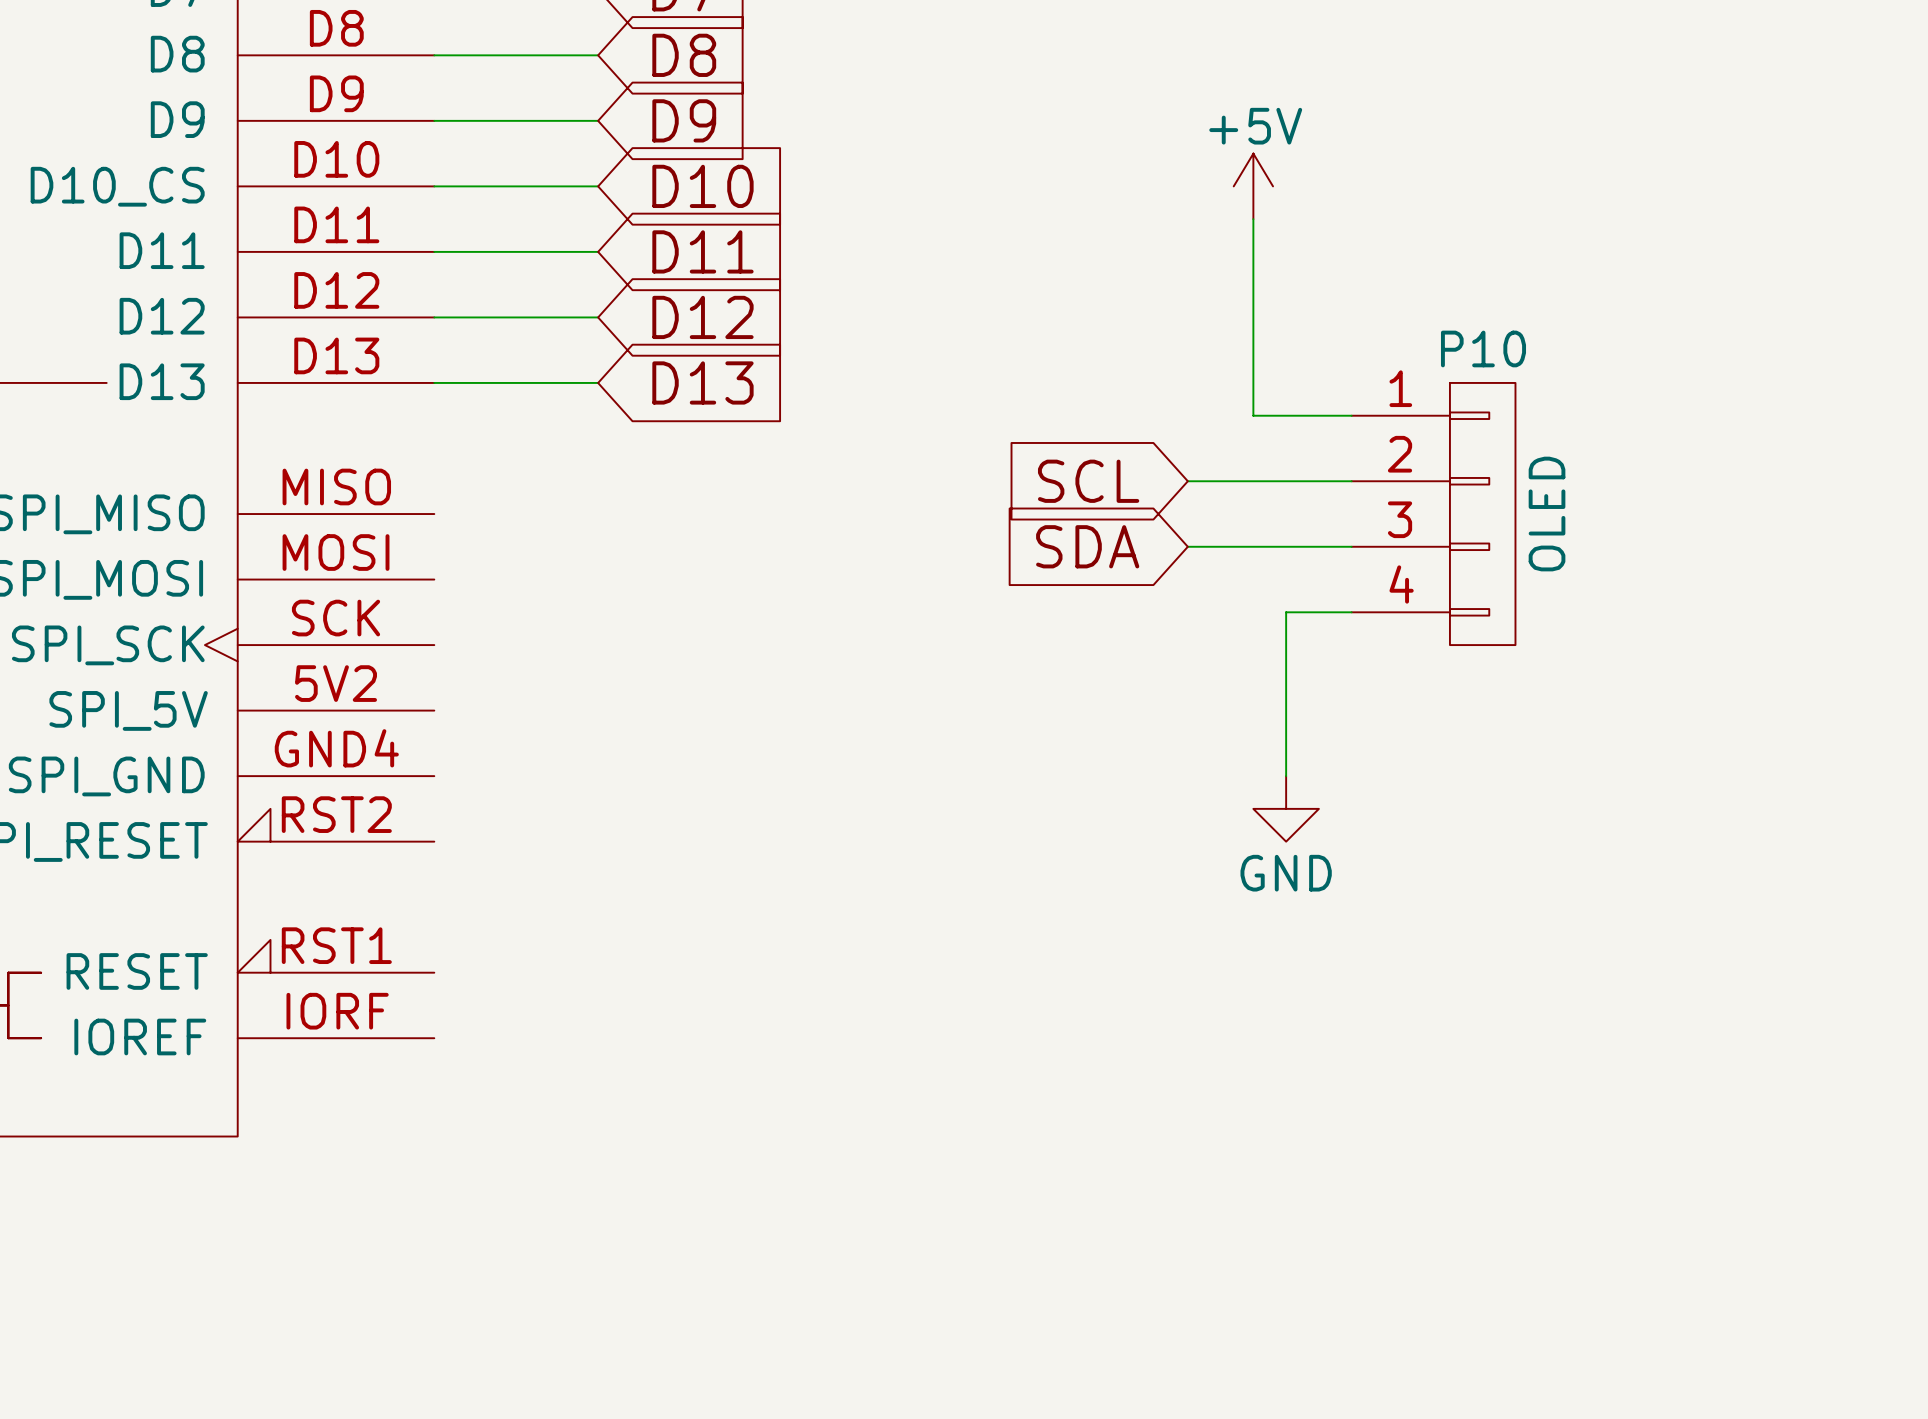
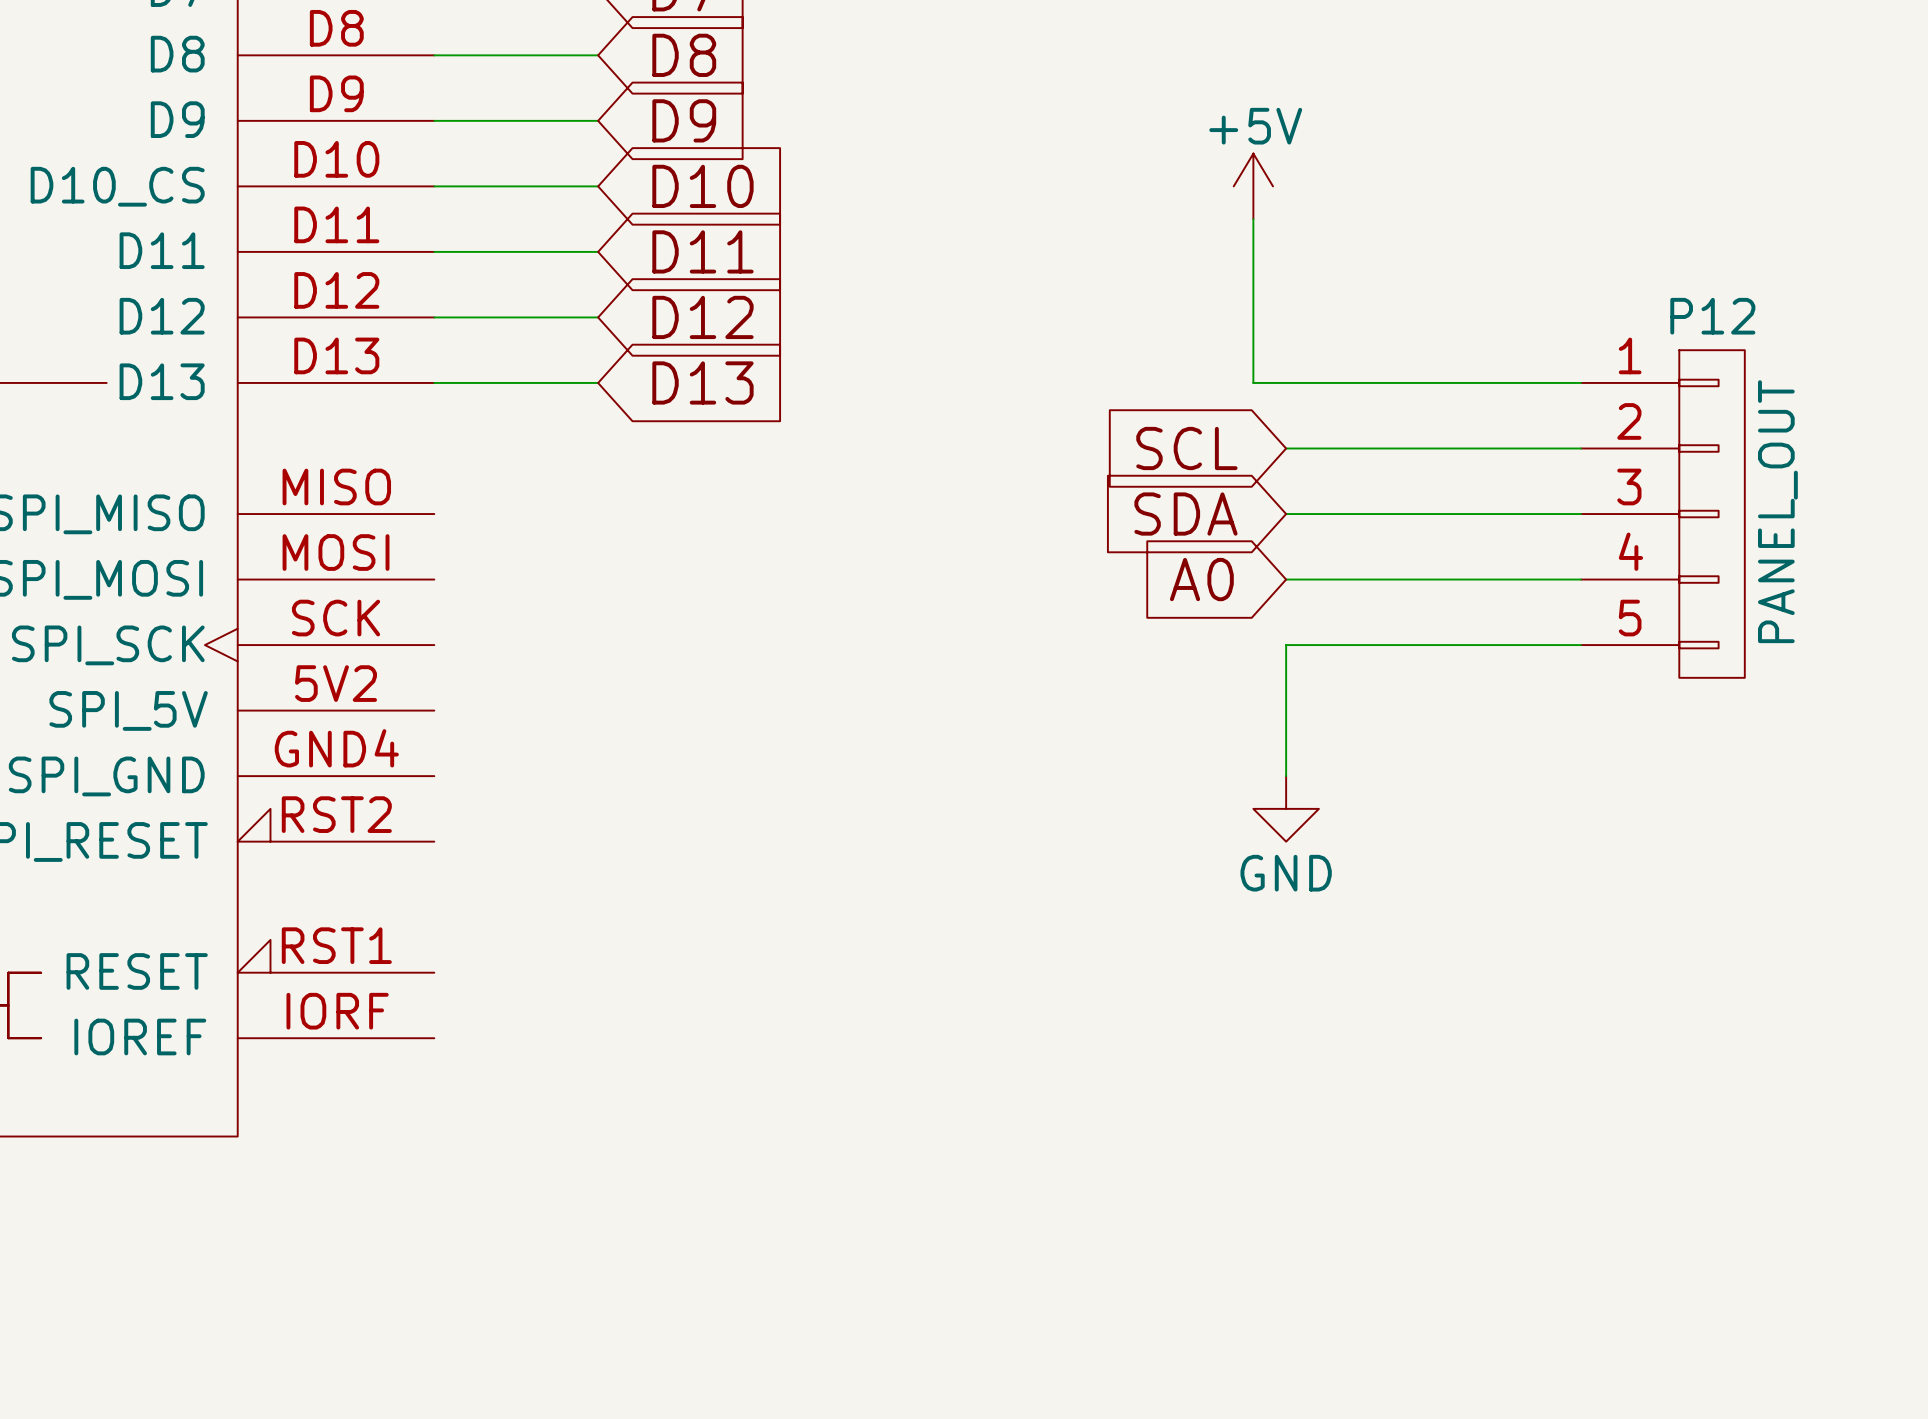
wire: (1253, 382) (1253, 415) (1351, 415) -> (1253, 382) (1581, 382)
wire: none -> (1286, 448) (1581, 448)
global label position: SCL (1088, 481) -> SCL (1186, 448)
wire: (1187, 481) (1351, 481) -> none
wire: none -> (1286, 514) (1581, 514)
P10: OLED (1433, 514) -> none
P12: none -> PANEL_OUT (1662, 514)
global label position: SDA (1087, 546) -> SDA (1185, 514)
wire: (1187, 546) (1351, 546) -> none
global label: none -> A0 (1201, 579)
wire: none -> (1286, 579) (1581, 579)
wire: (1351, 612) (1286, 612) (1286, 645) -> (1581, 645) (1286, 645)

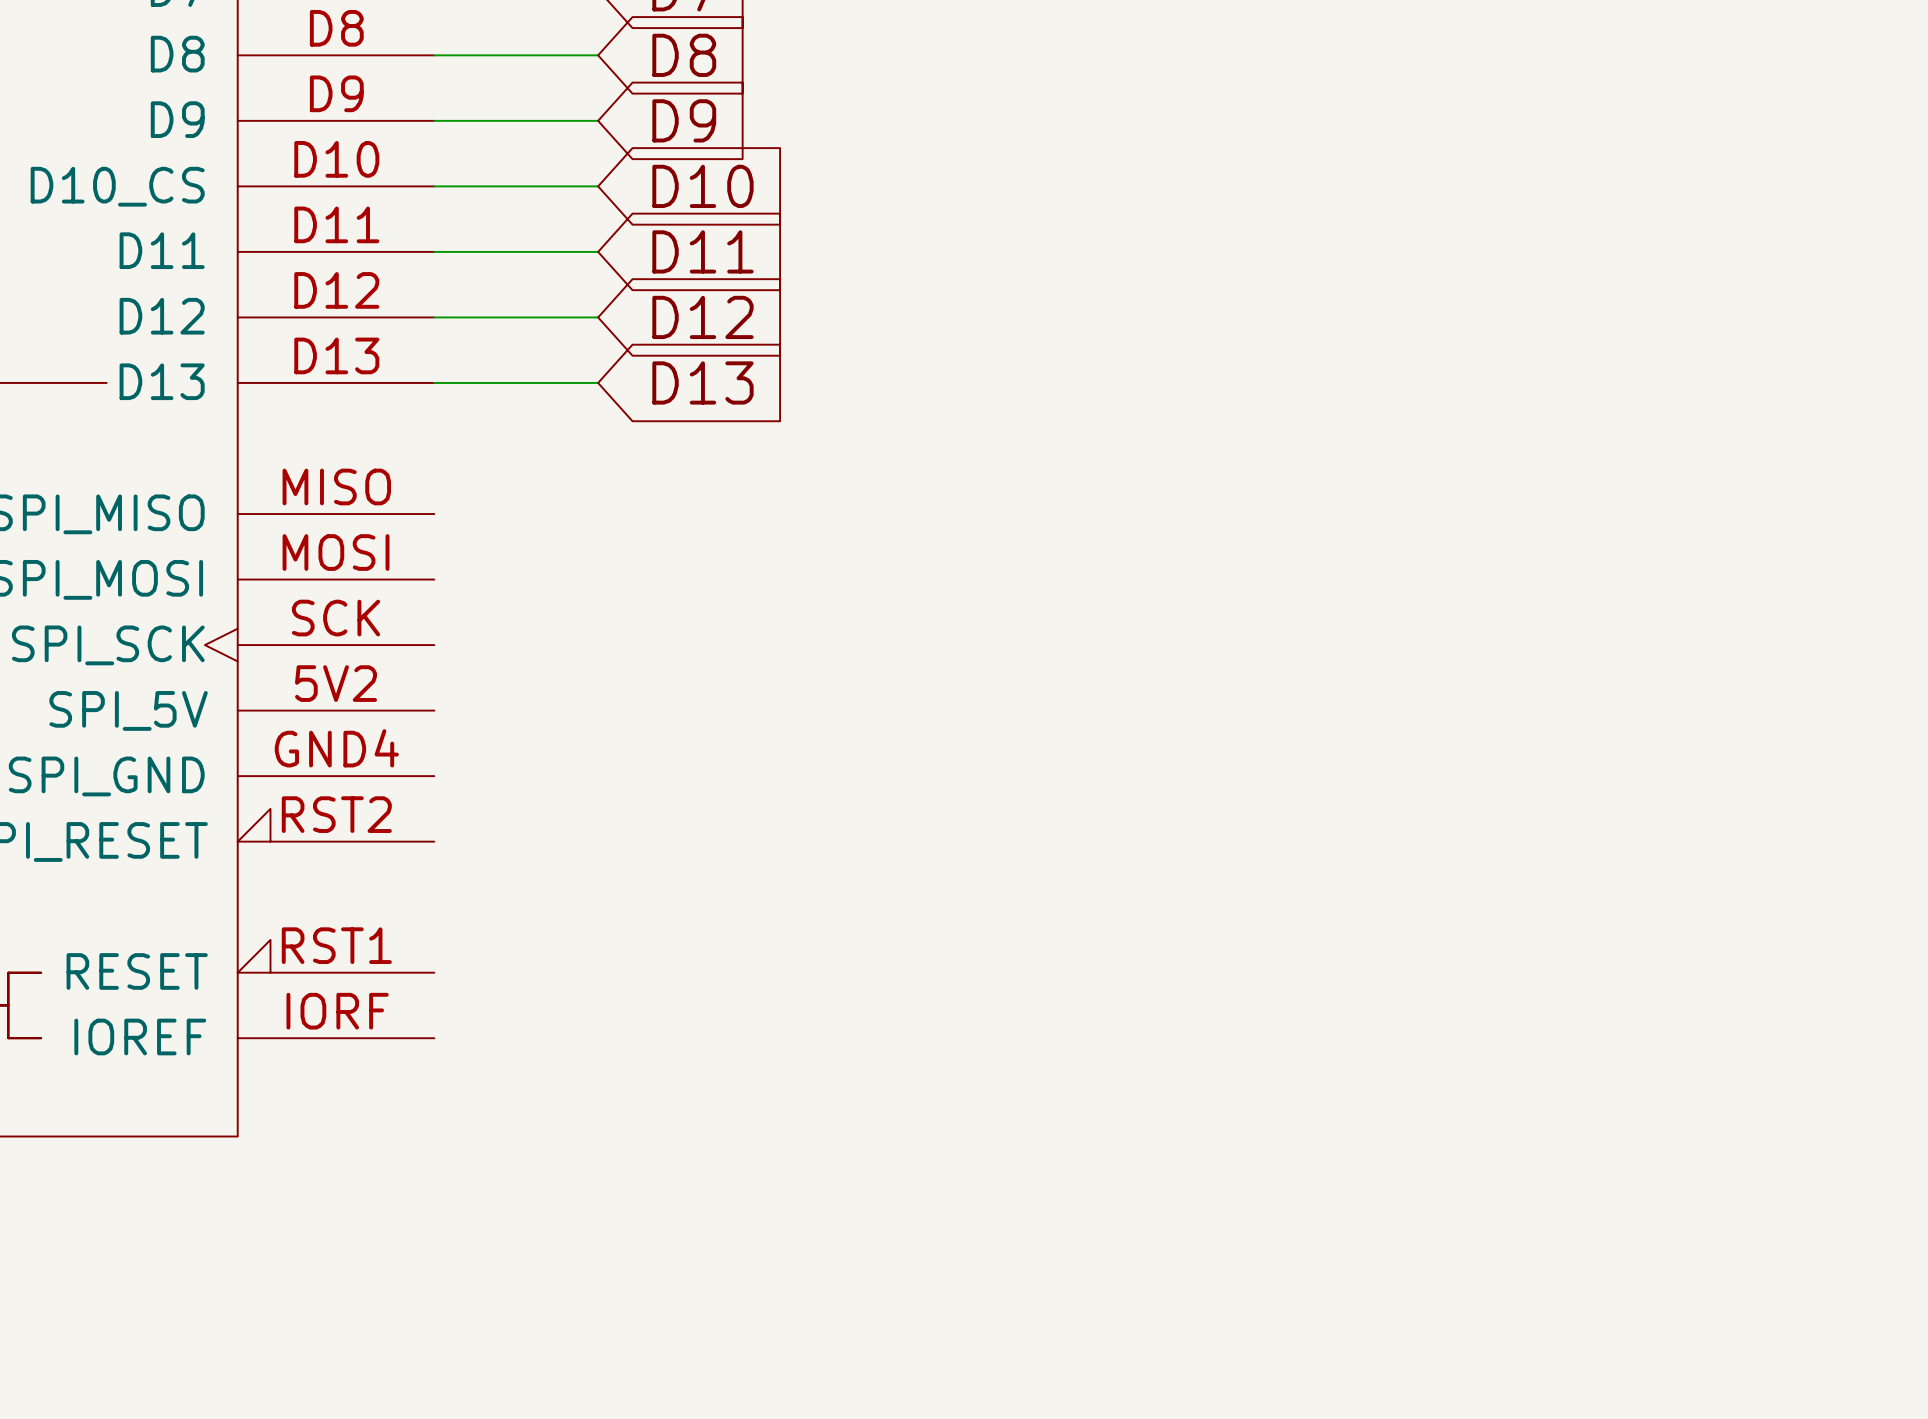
power symbol: +5V (1253, 186) -> none
wire: (1253, 219) (1253, 382) (1581, 382) -> none
global label: SCL (1186, 448) -> none
wire: (1286, 448) (1581, 448) -> none
global label: SDA (1185, 514) -> none
wire: (1286, 514) (1581, 514) -> none
P12: PANEL_OUT (1662, 514) -> none
global label: A0 (1201, 579) -> none
wire: (1286, 579) (1581, 579) -> none
wire: (1581, 645) (1286, 645) (1286, 776) -> none
power symbol: GND (1286, 808) -> none

